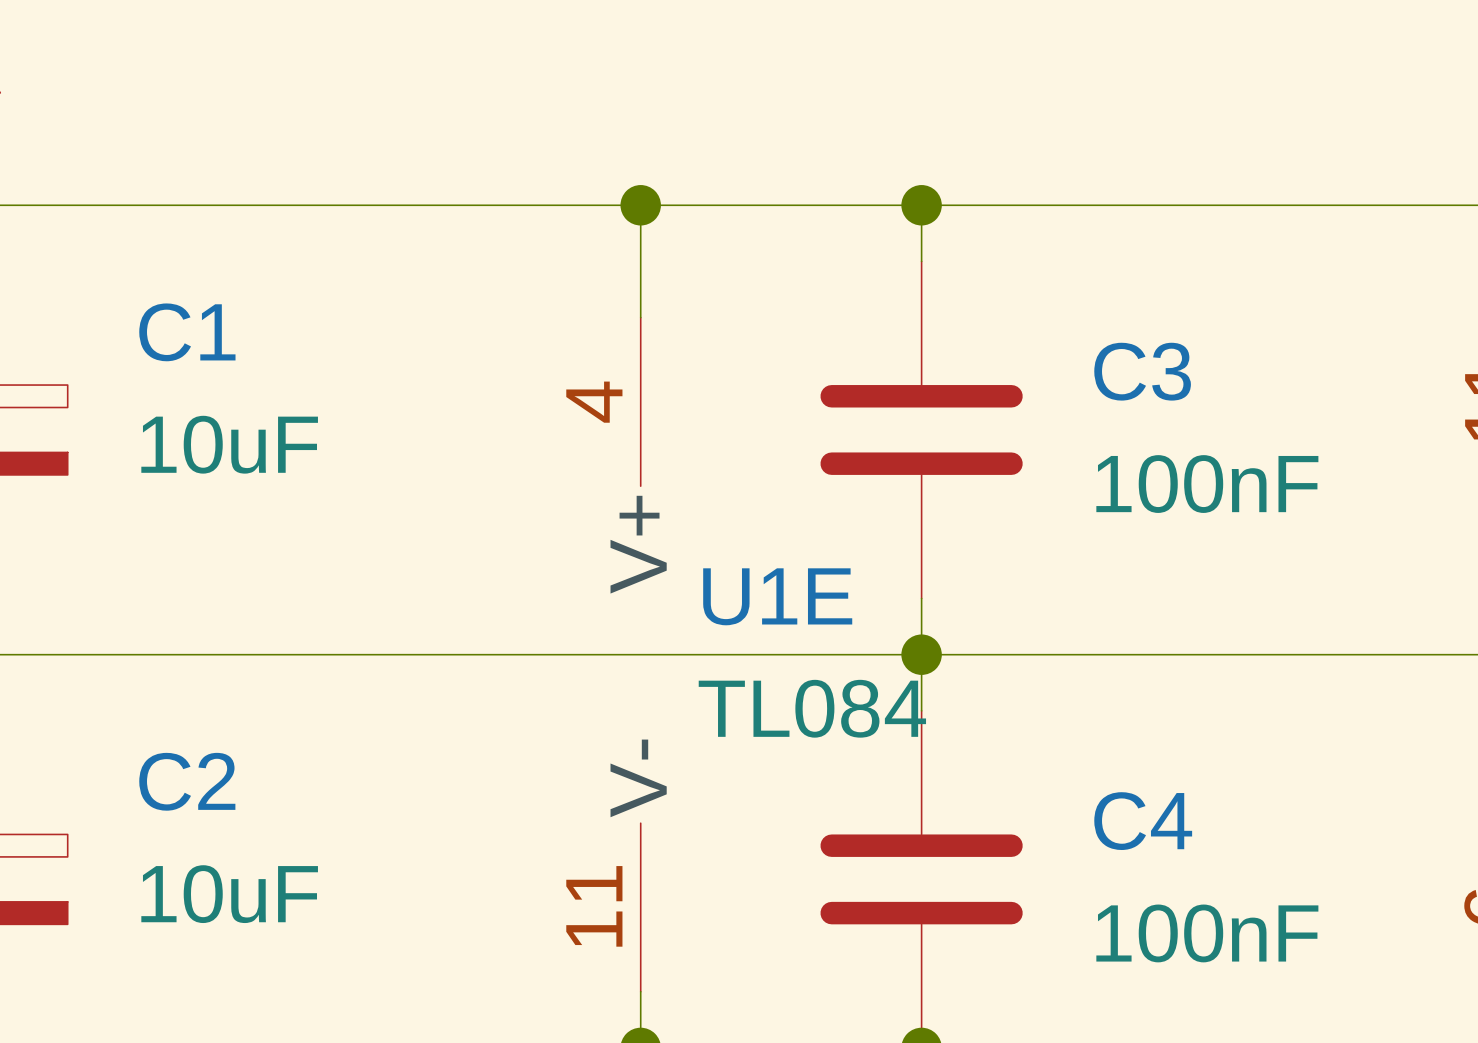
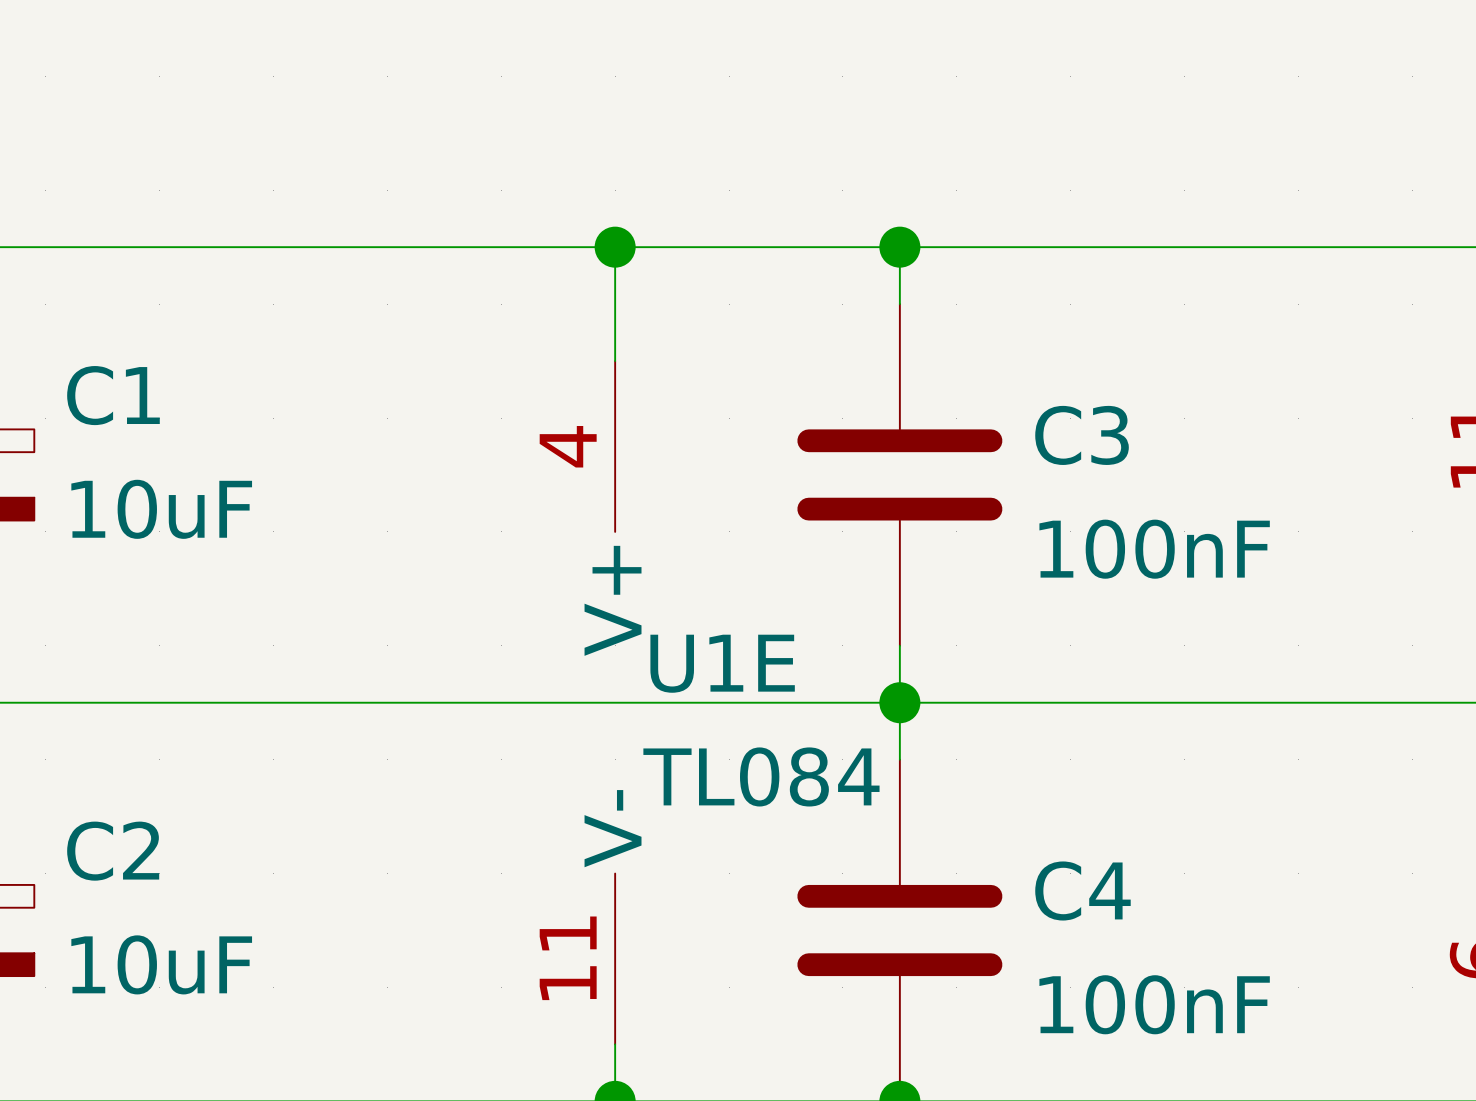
C1 name position: C1 (187, 332) -> C1 (113, 395)
C3 name position: C3 (1142, 371) -> C3 (1082, 435)
C1 value position: 10uF (229, 444) -> 10uF (161, 509)
C3 value position: 100nF (1207, 484) -> 100nF (1154, 549)
U1E name position: U1E (777, 596) -> U1E (722, 663)
U1E value position: TL084 (812, 708) -> TL084 (761, 776)
C2 name position: C2 (187, 781) -> C2 (113, 851)
C4 name position: C4 (1143, 821) -> C4 (1082, 891)
C2 value position: 10uF (229, 894) -> 10uF (161, 964)
C4 value position: 100nF (1207, 933) -> 100nF (1154, 1004)

